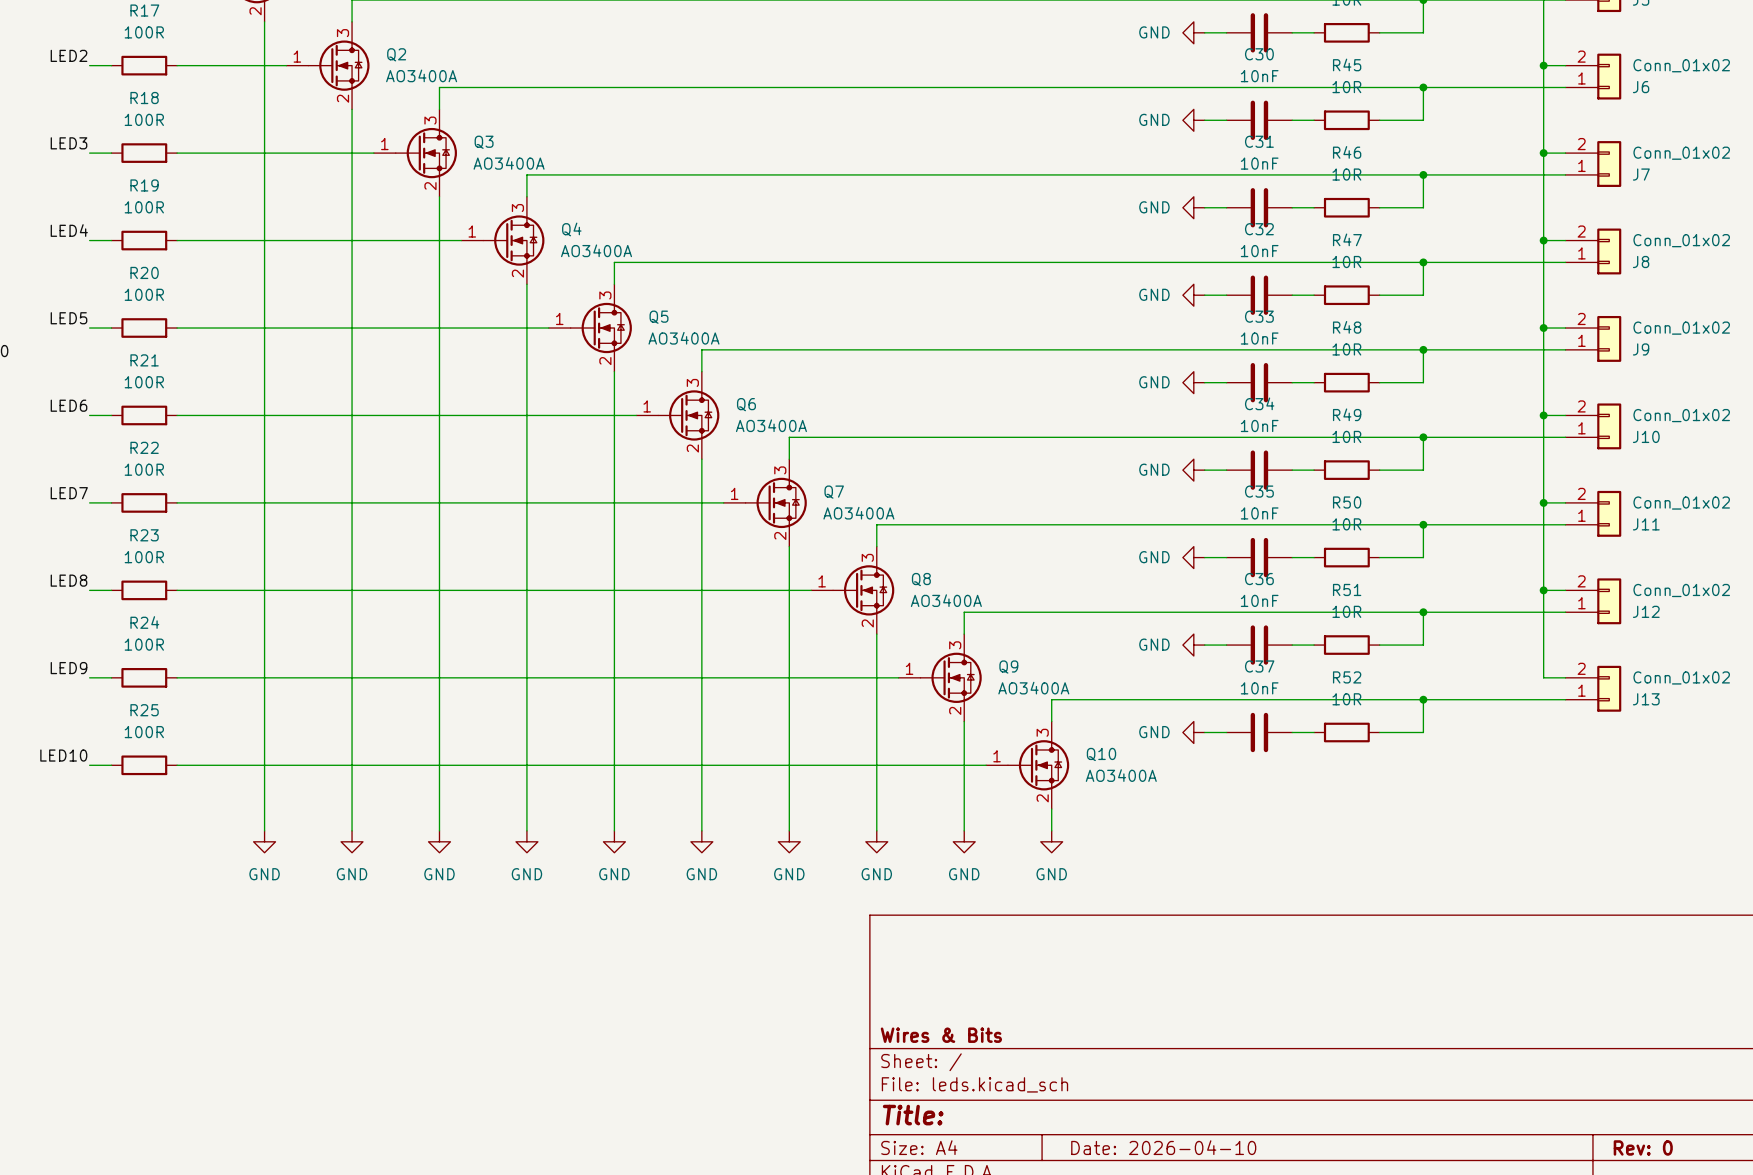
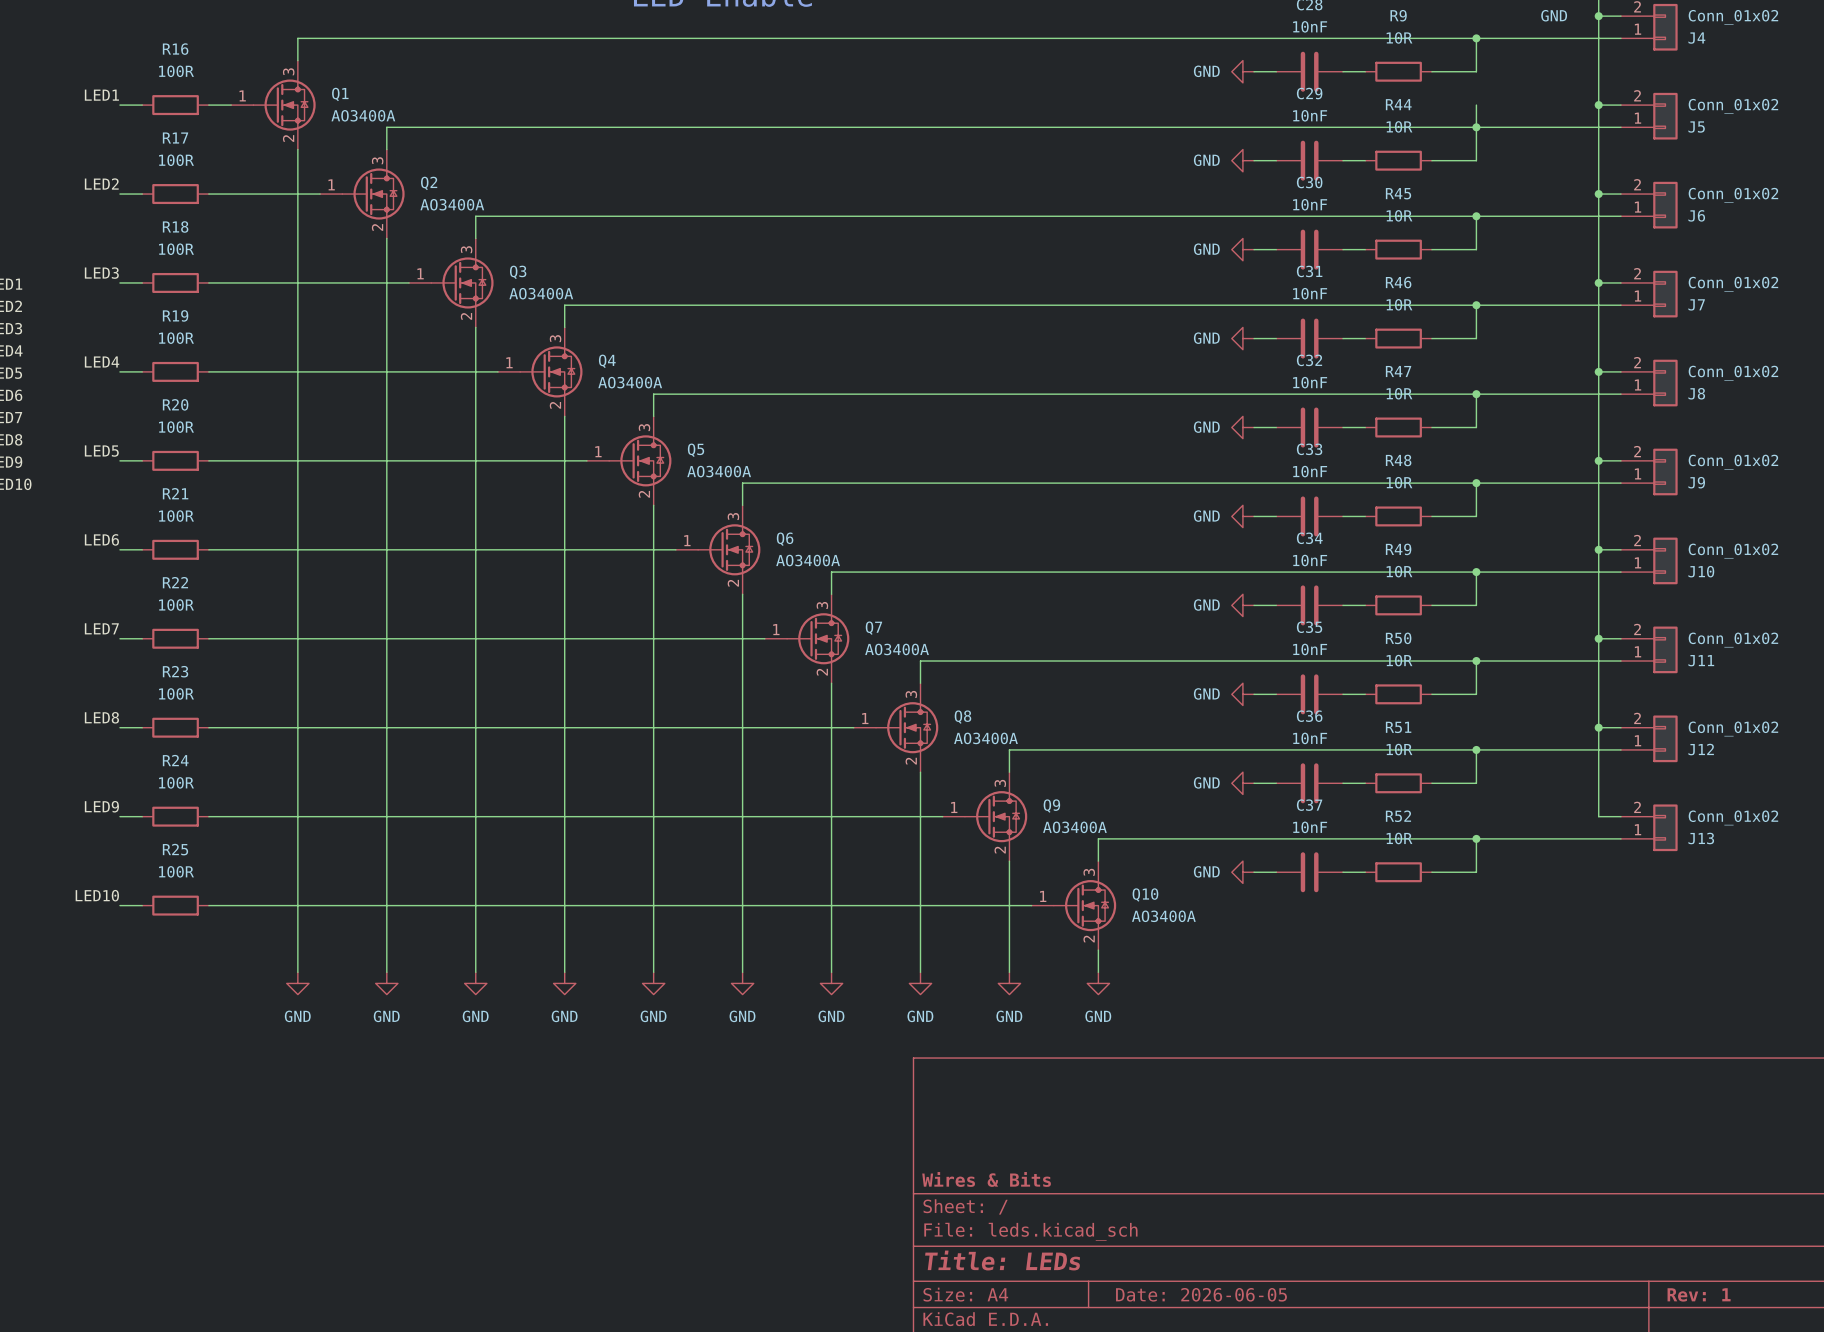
title block: Title: (913, 1115) -> Title: LEDs (1002, 1260)
title block: Date: 2026-04-10 (1163, 1147) -> Date: 2026-06-05 (1201, 1294)
title block: Rev: 0 (1643, 1147) -> Rev: 1 (1699, 1294)

